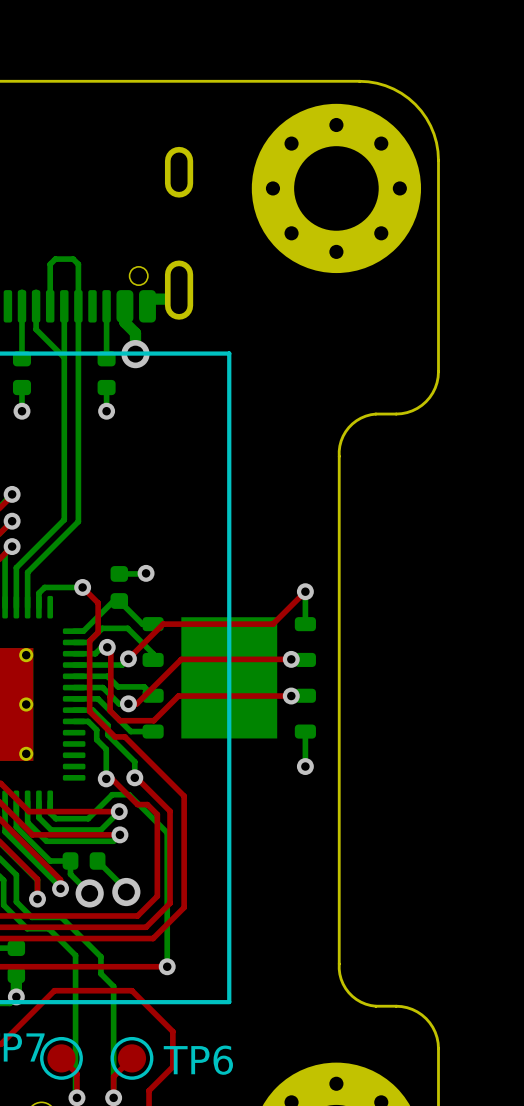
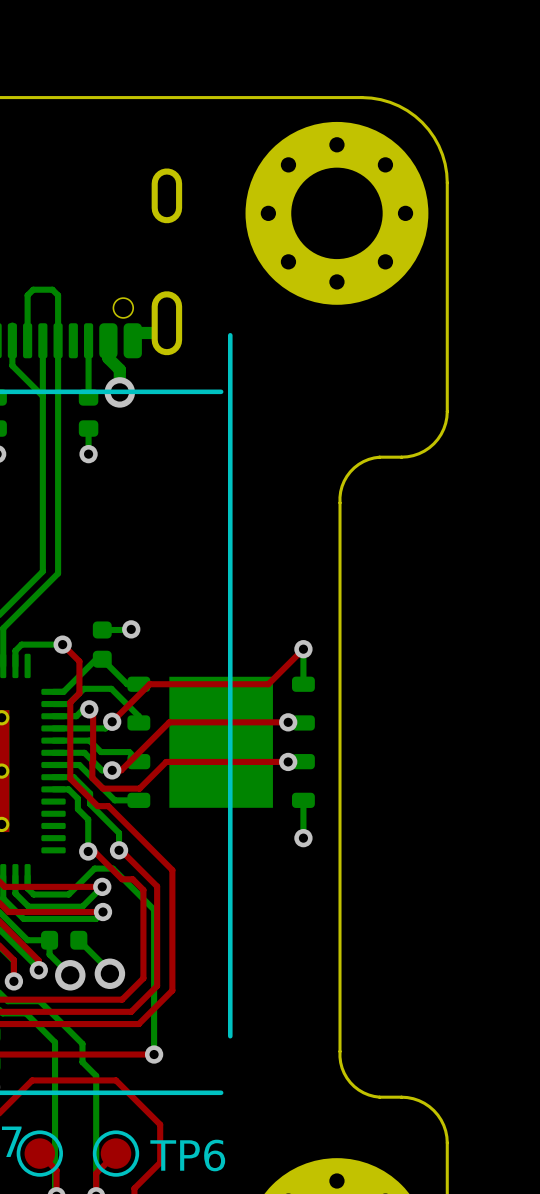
line: (229, 353) (229, 1001) -> (230, 335) (230, 1036)

